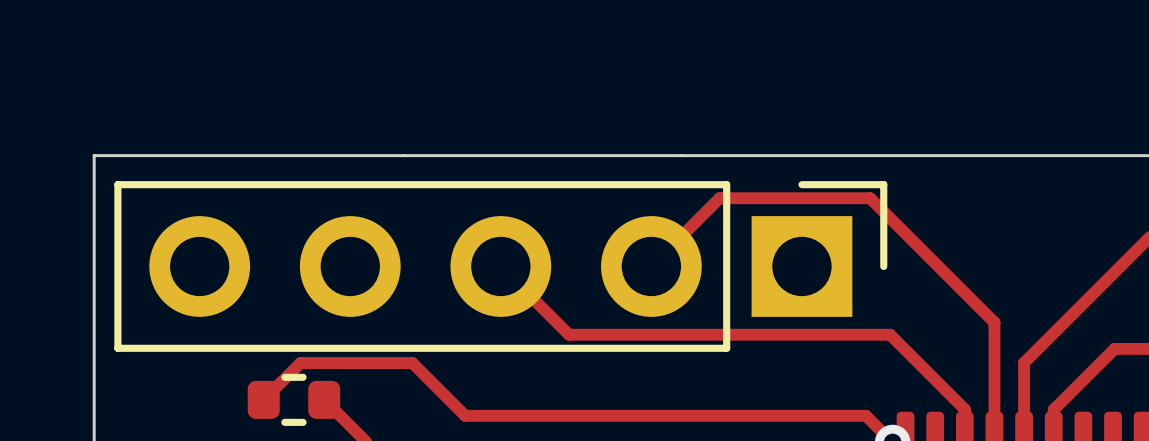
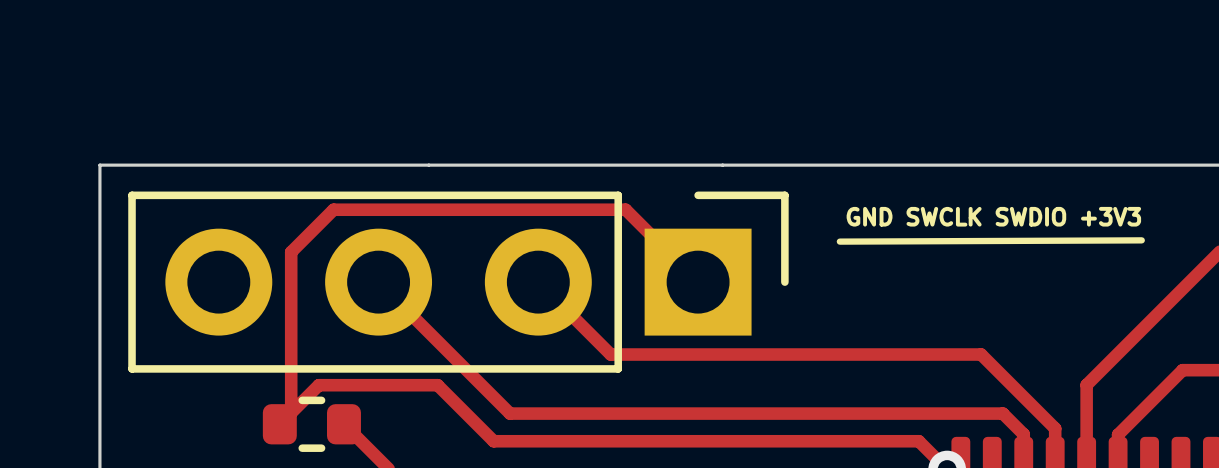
text: none -> GND SWCLK SWDIO +3V3 (993, 216)
line: none -> (1141, 240) (839, 241)
part: none -> (458, 282)
track: none -> (698, 282) (625, 209) (333, 209) (291, 252) (291, 412)
track: (500, 266) (569, 334) (890, 334) (945, 389) -> (378, 282) (510, 413) (1002, 413)
part: (500, 266) -> none
track: (651, 266) (719, 198) (870, 198) (994, 322) (994, 403) -> (538, 282) (610, 354) (981, 354) (1055, 428)

